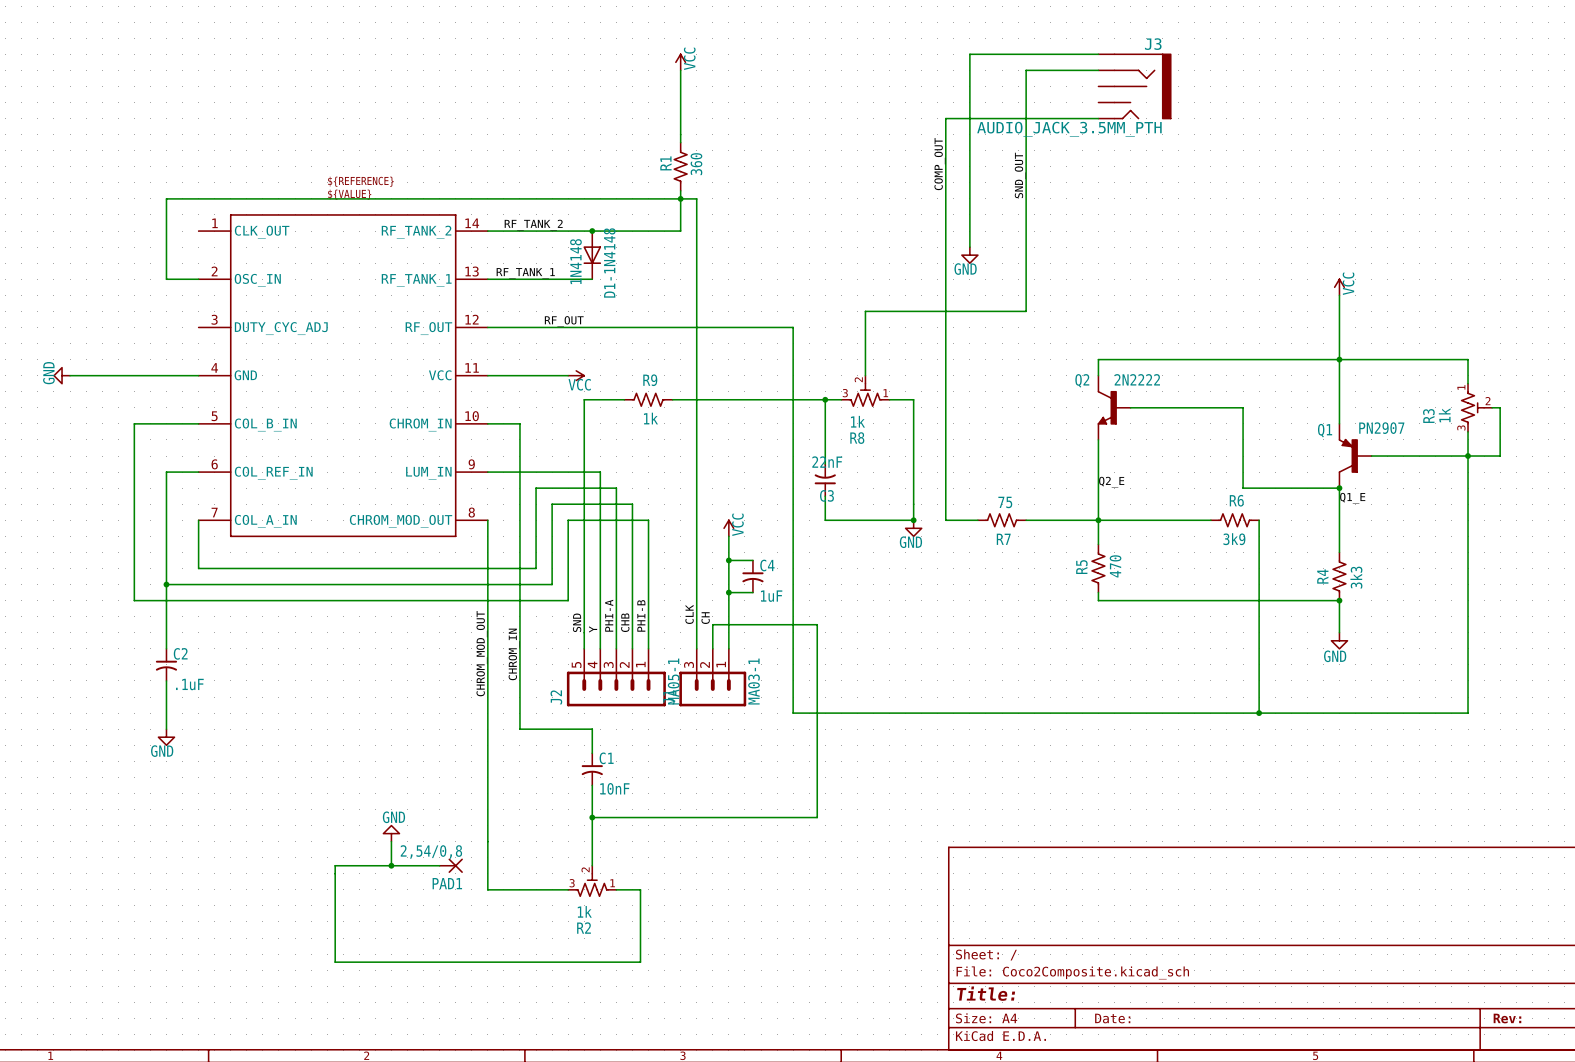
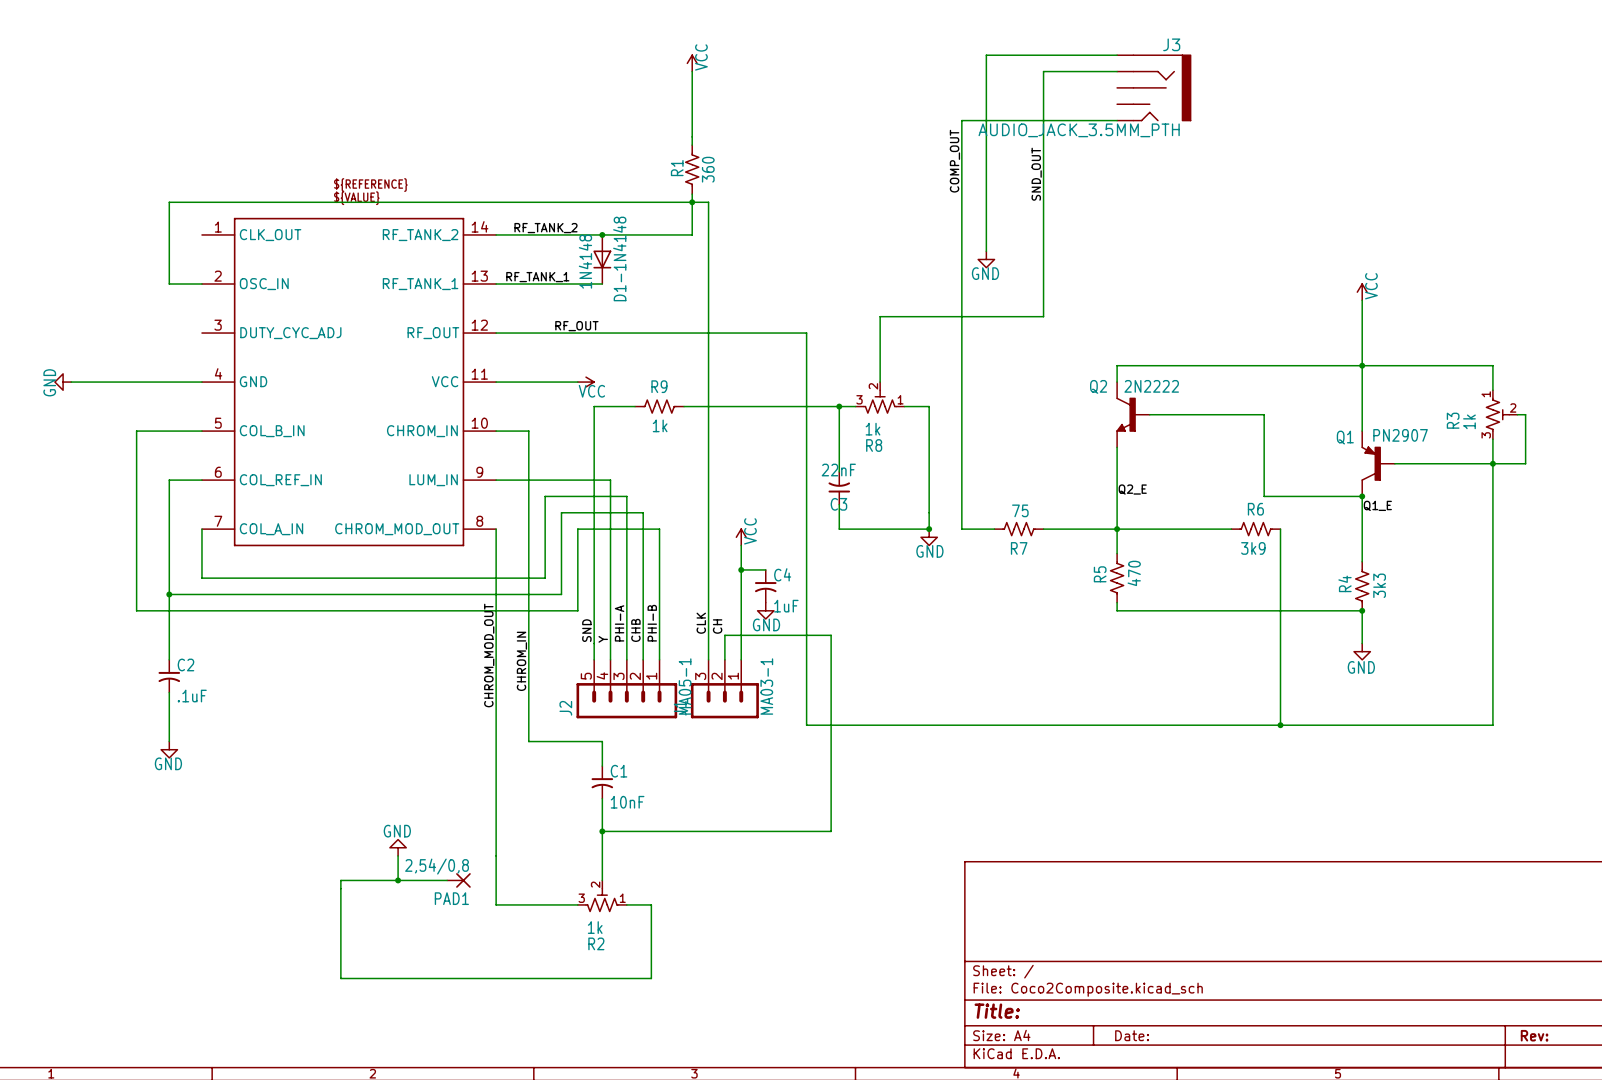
wire: (728, 592) (752, 592) -> none
junction: (728, 592) -> none
power symbol: none -> GND (765, 610)

